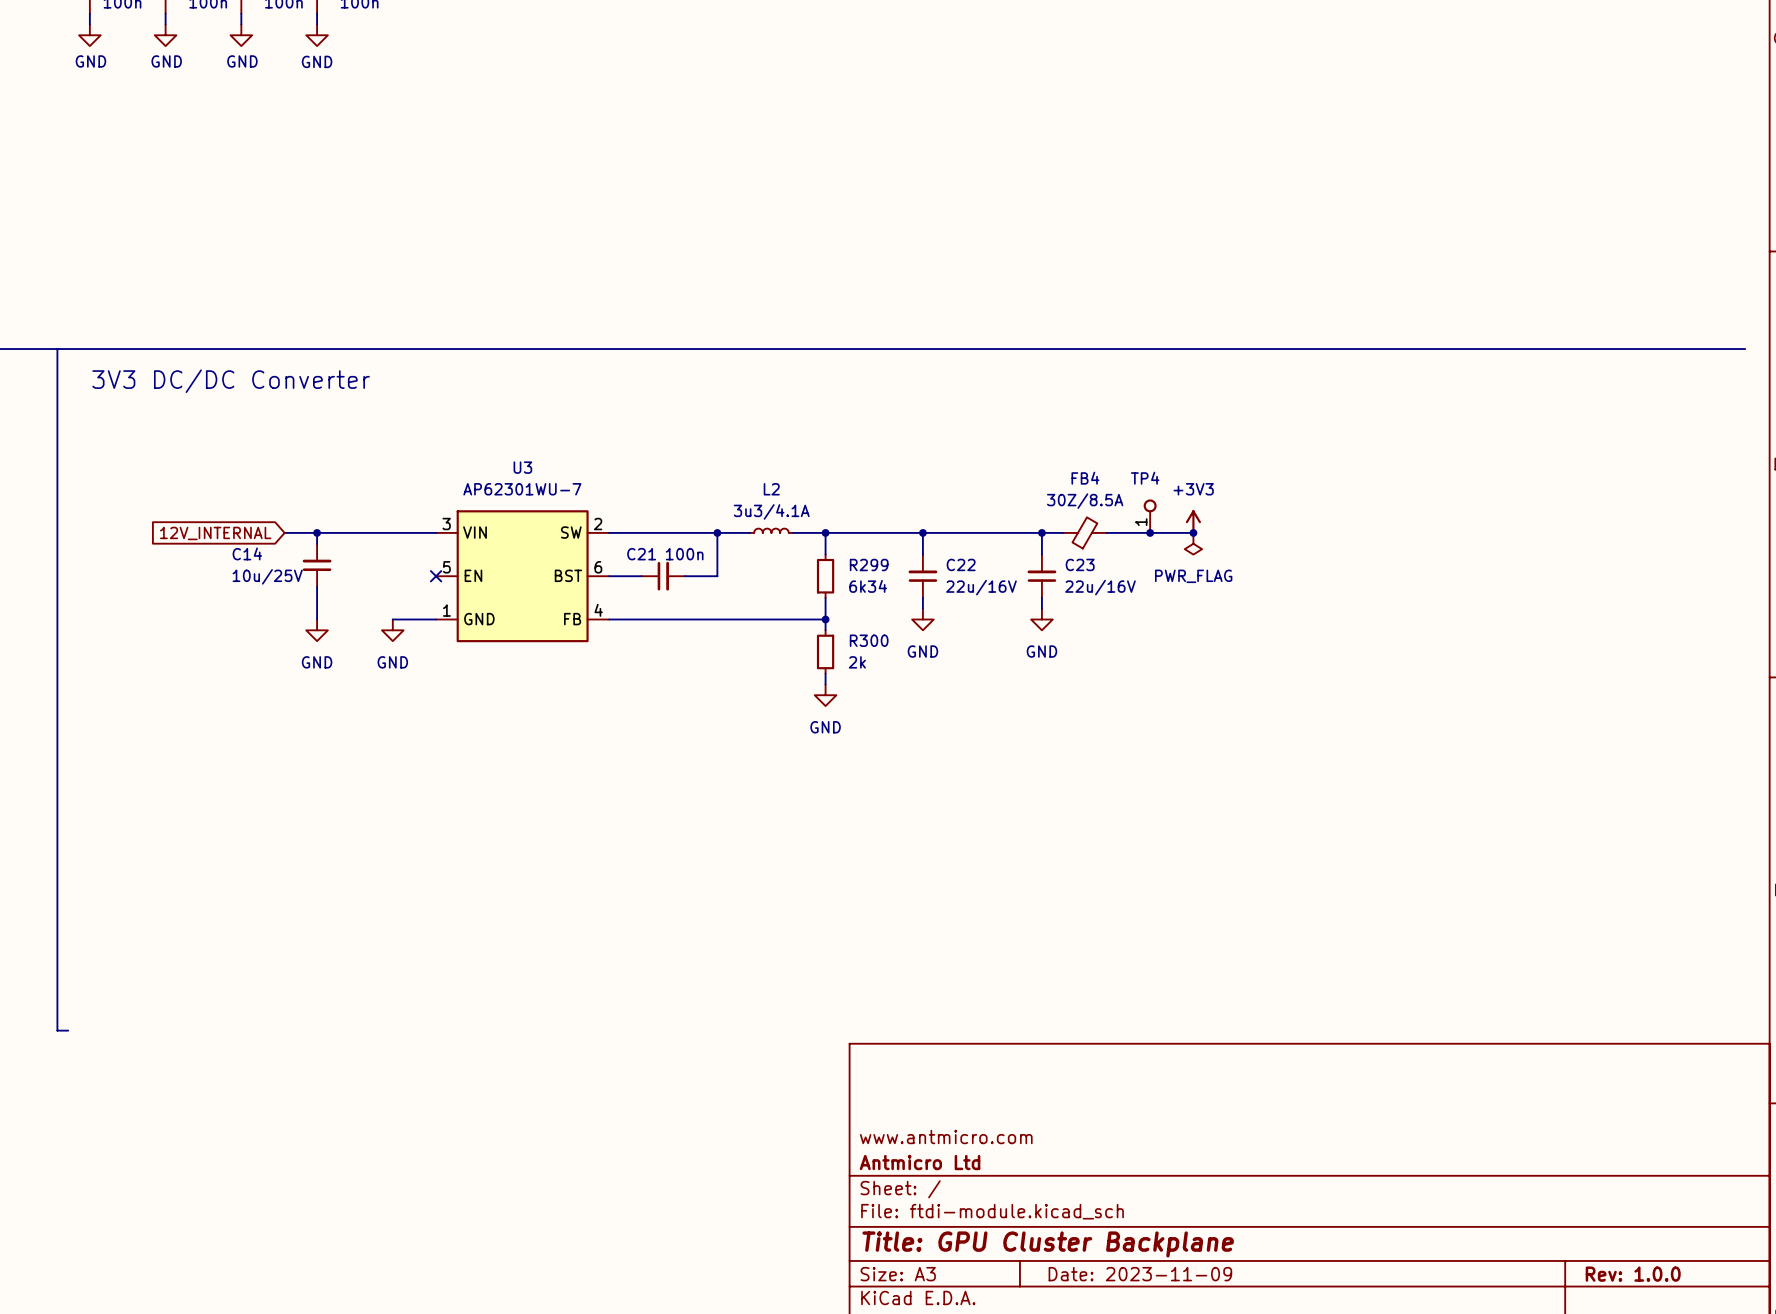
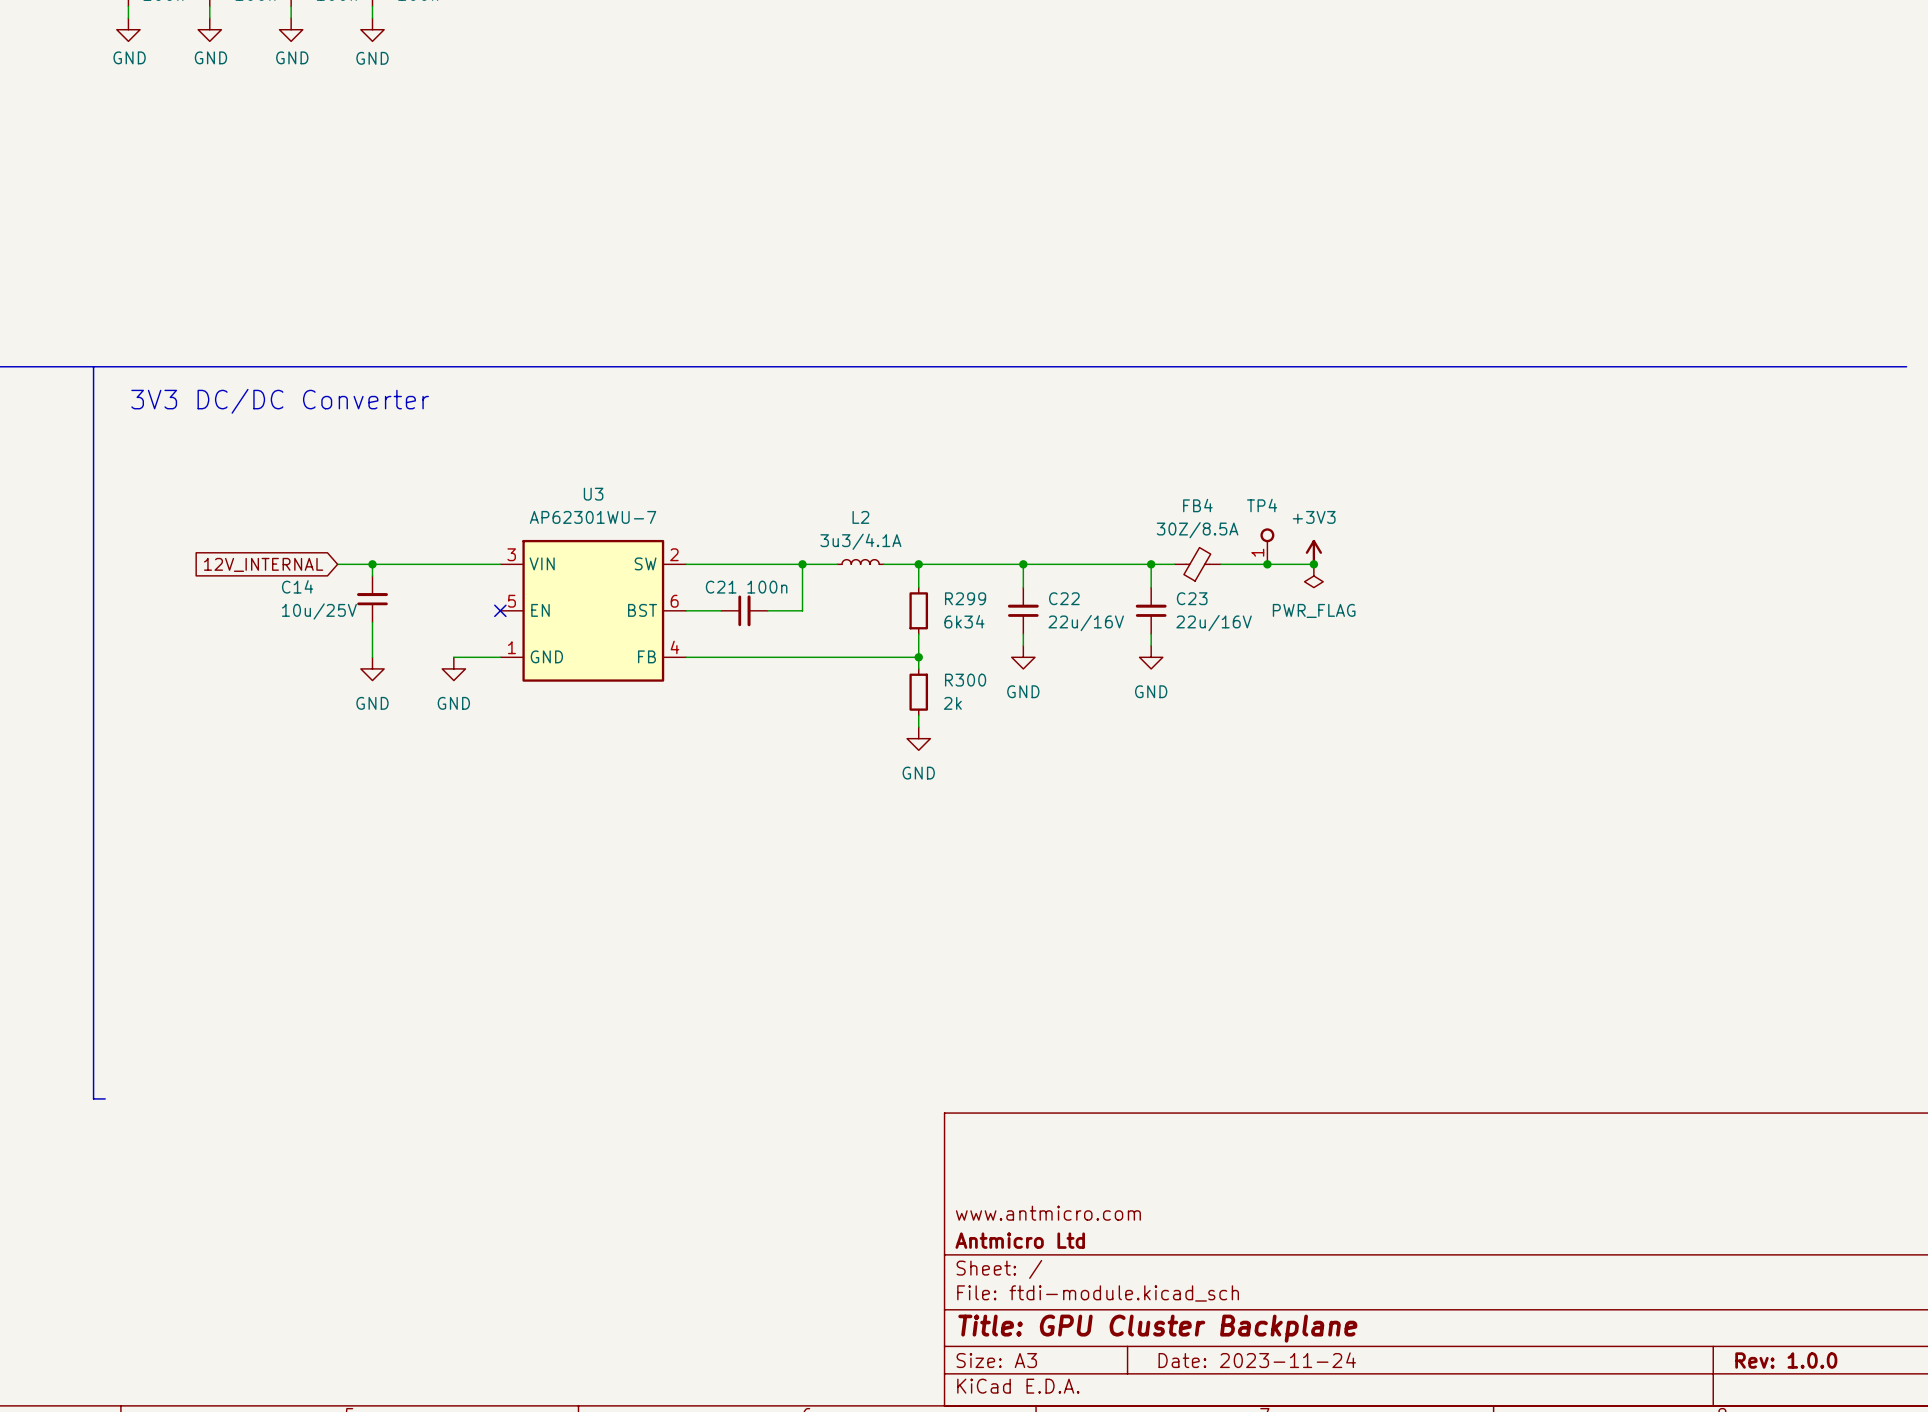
title block: Date: 2023-11-09 (1140, 1274) -> Date: 2023-11-24 (1257, 1360)

